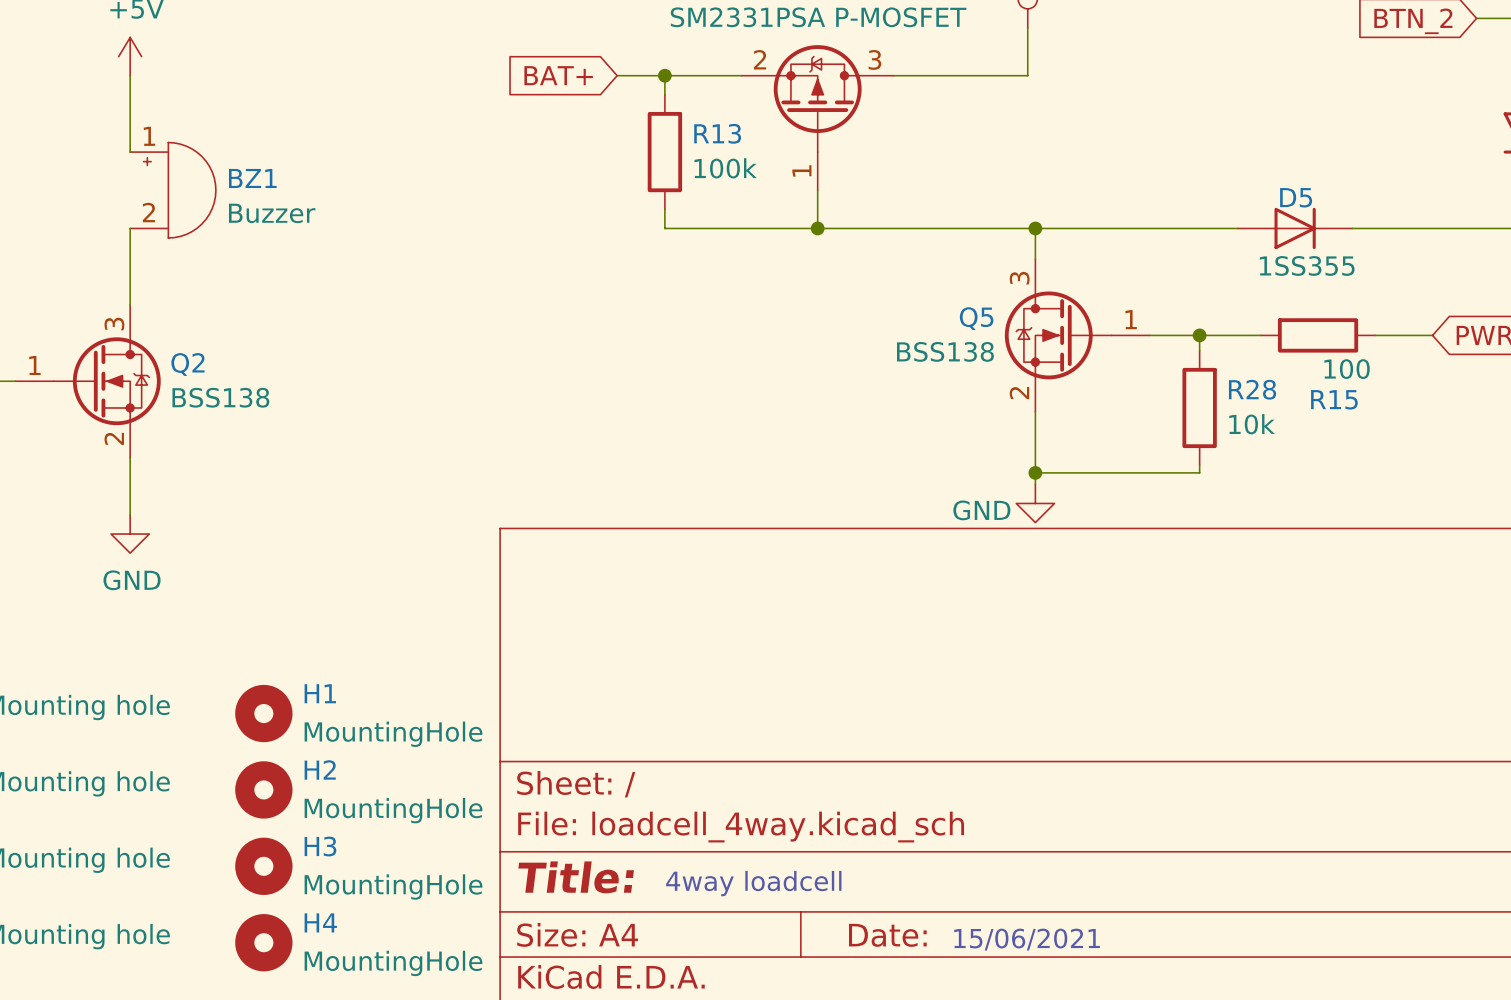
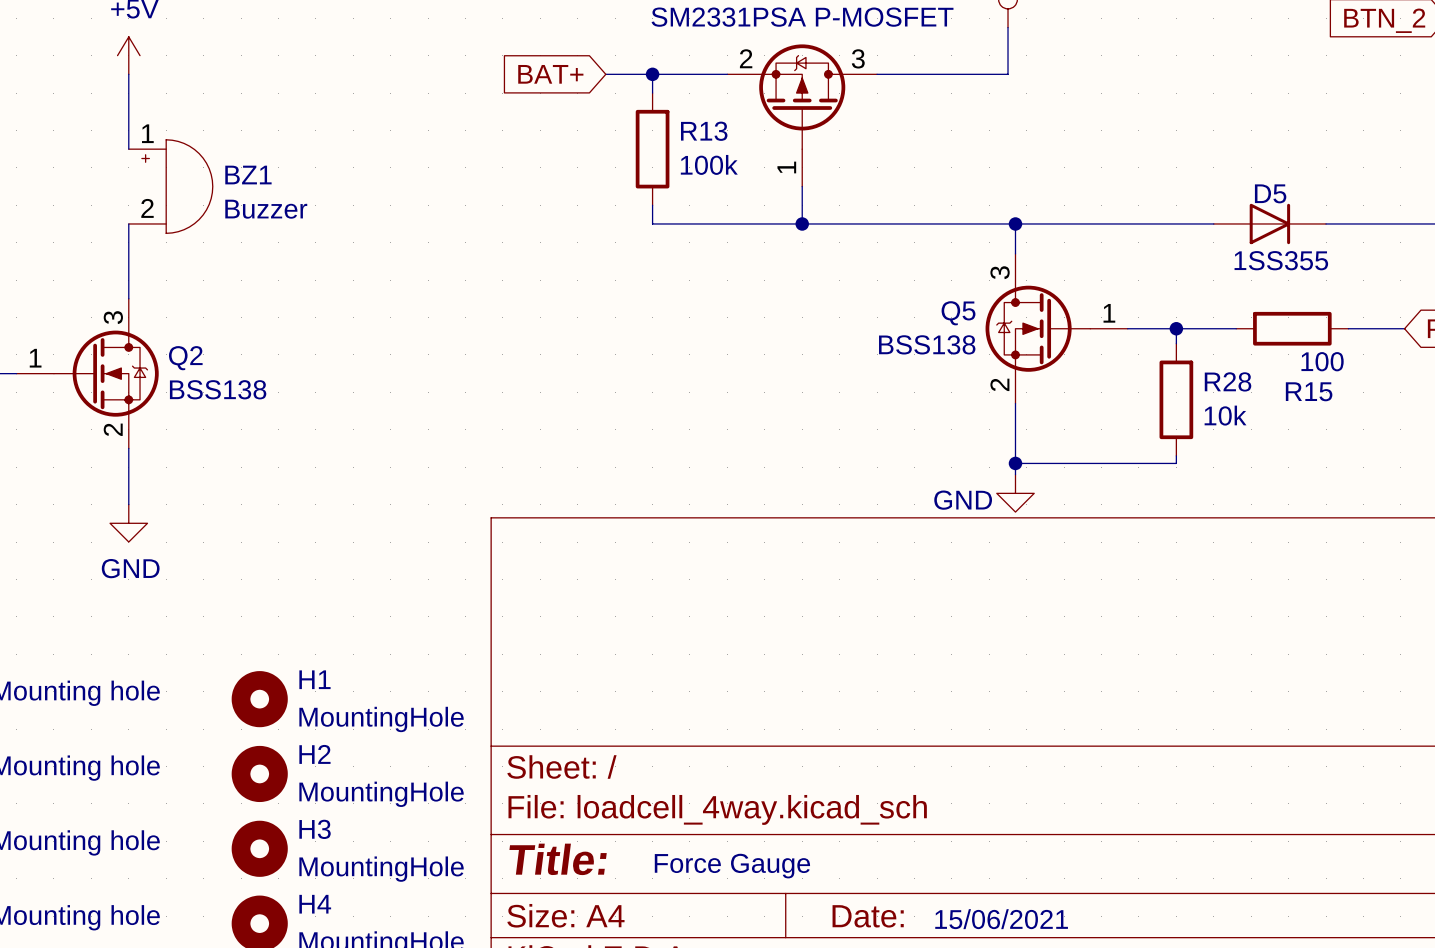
text: 4way loadcell (753, 883) -> Force Gauge (732, 866)

